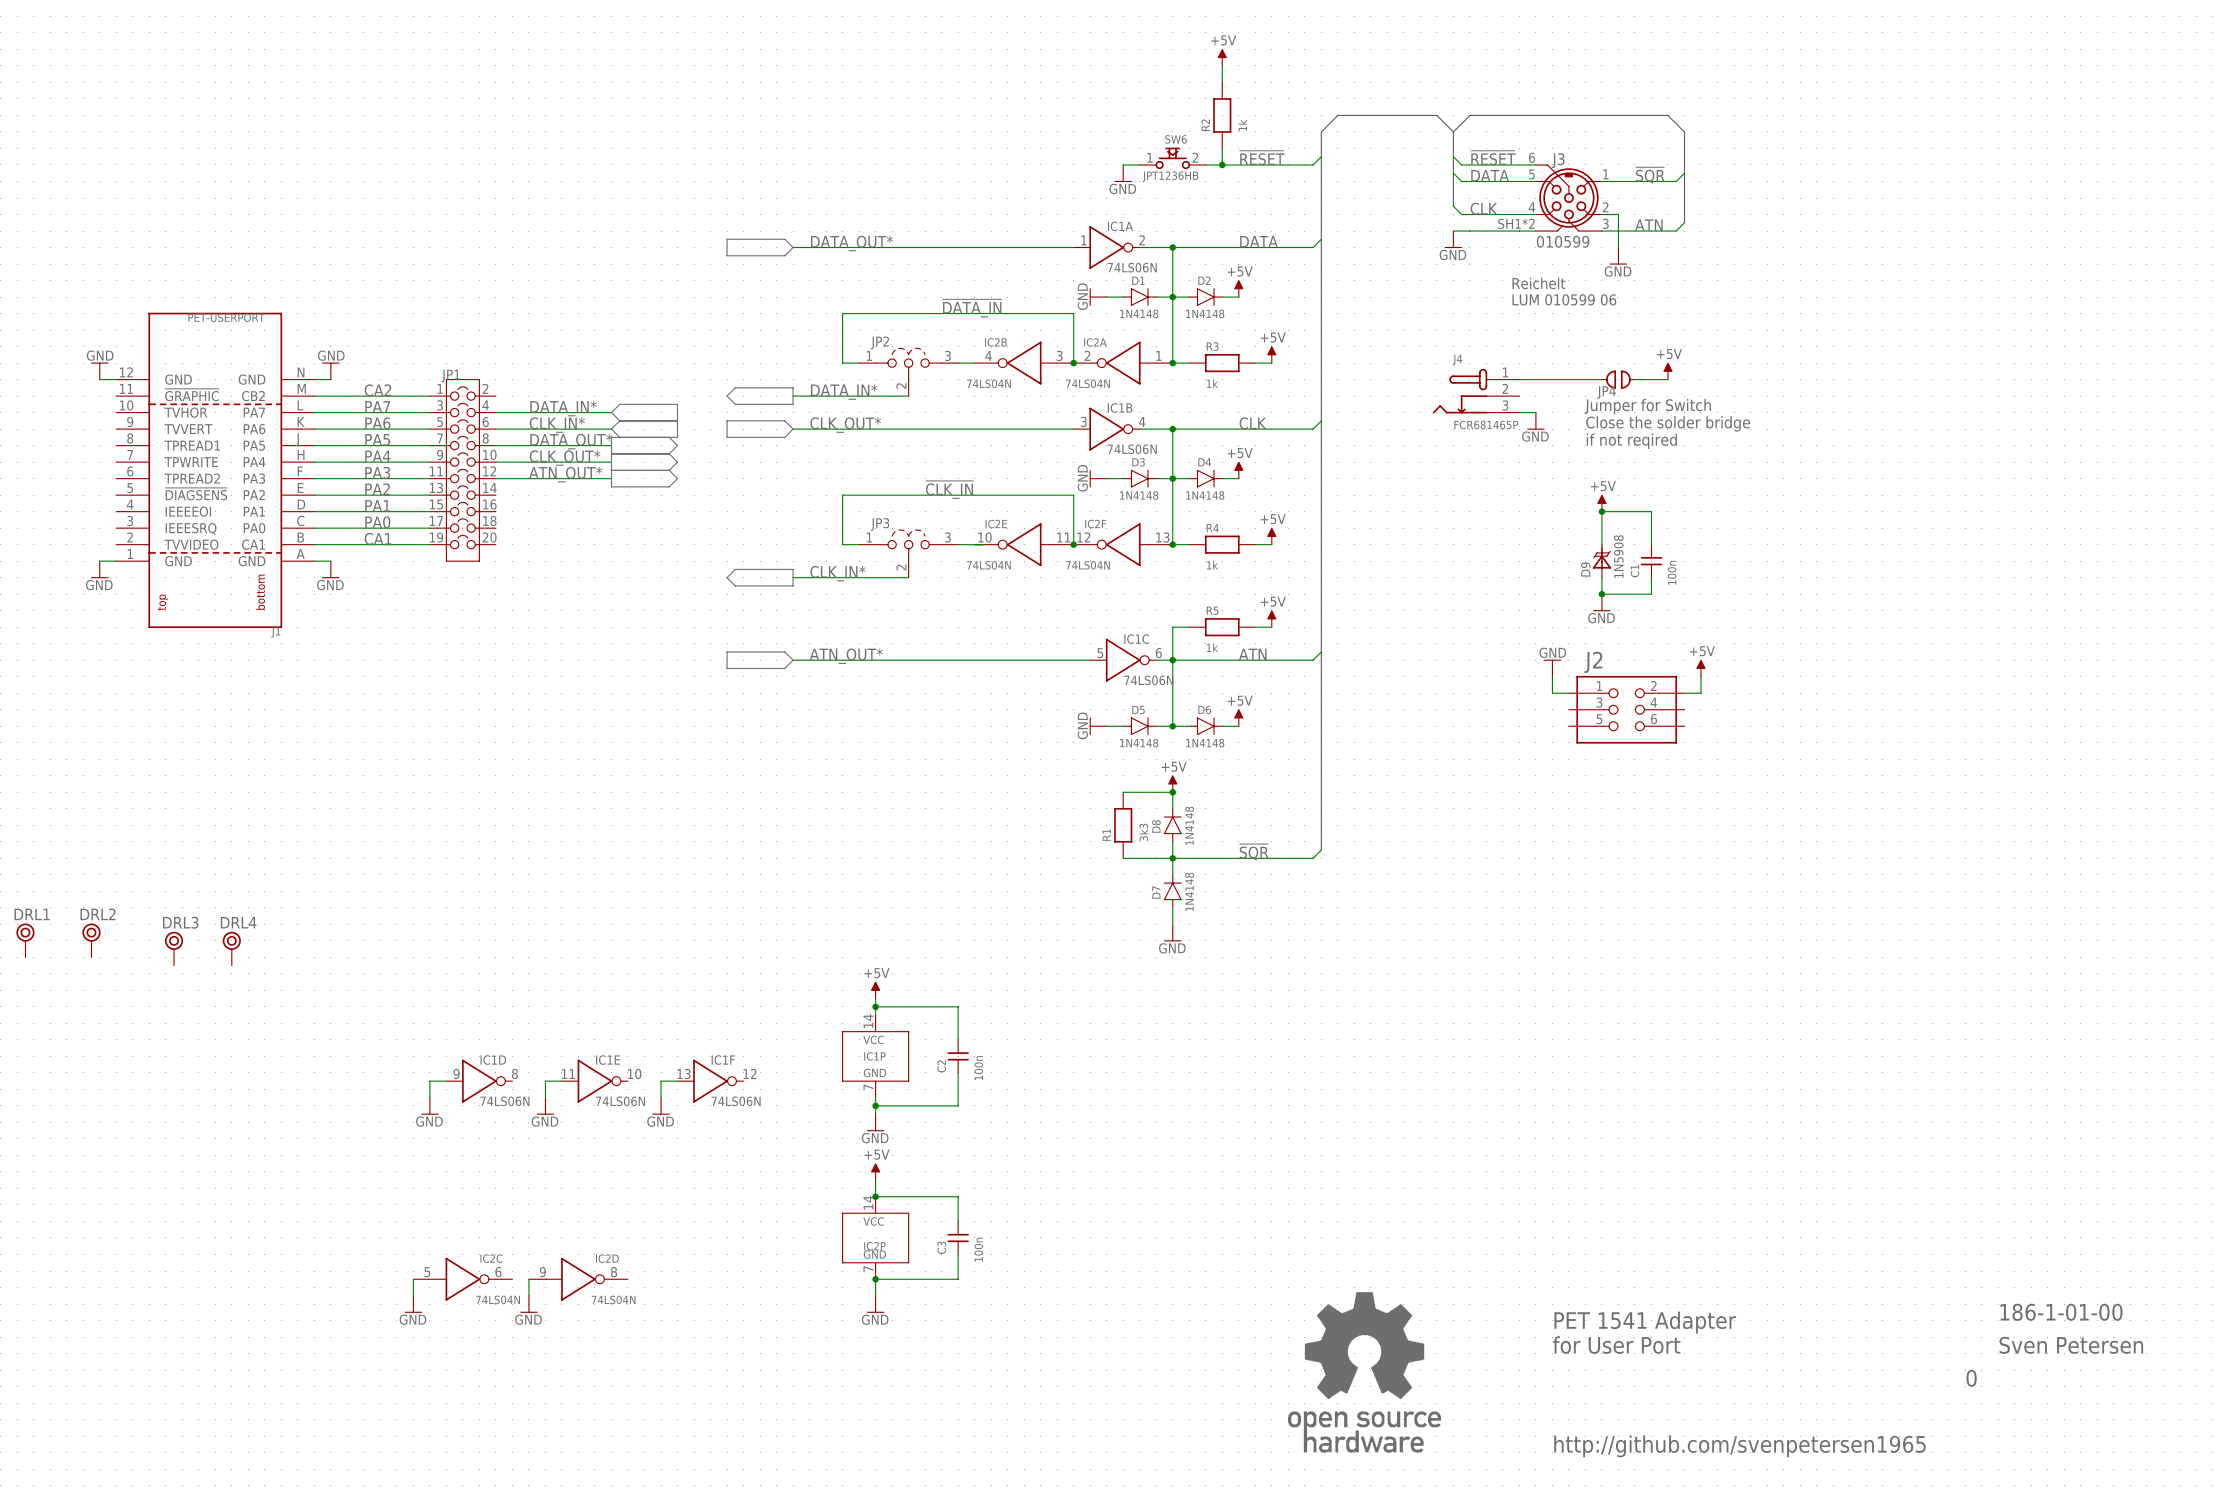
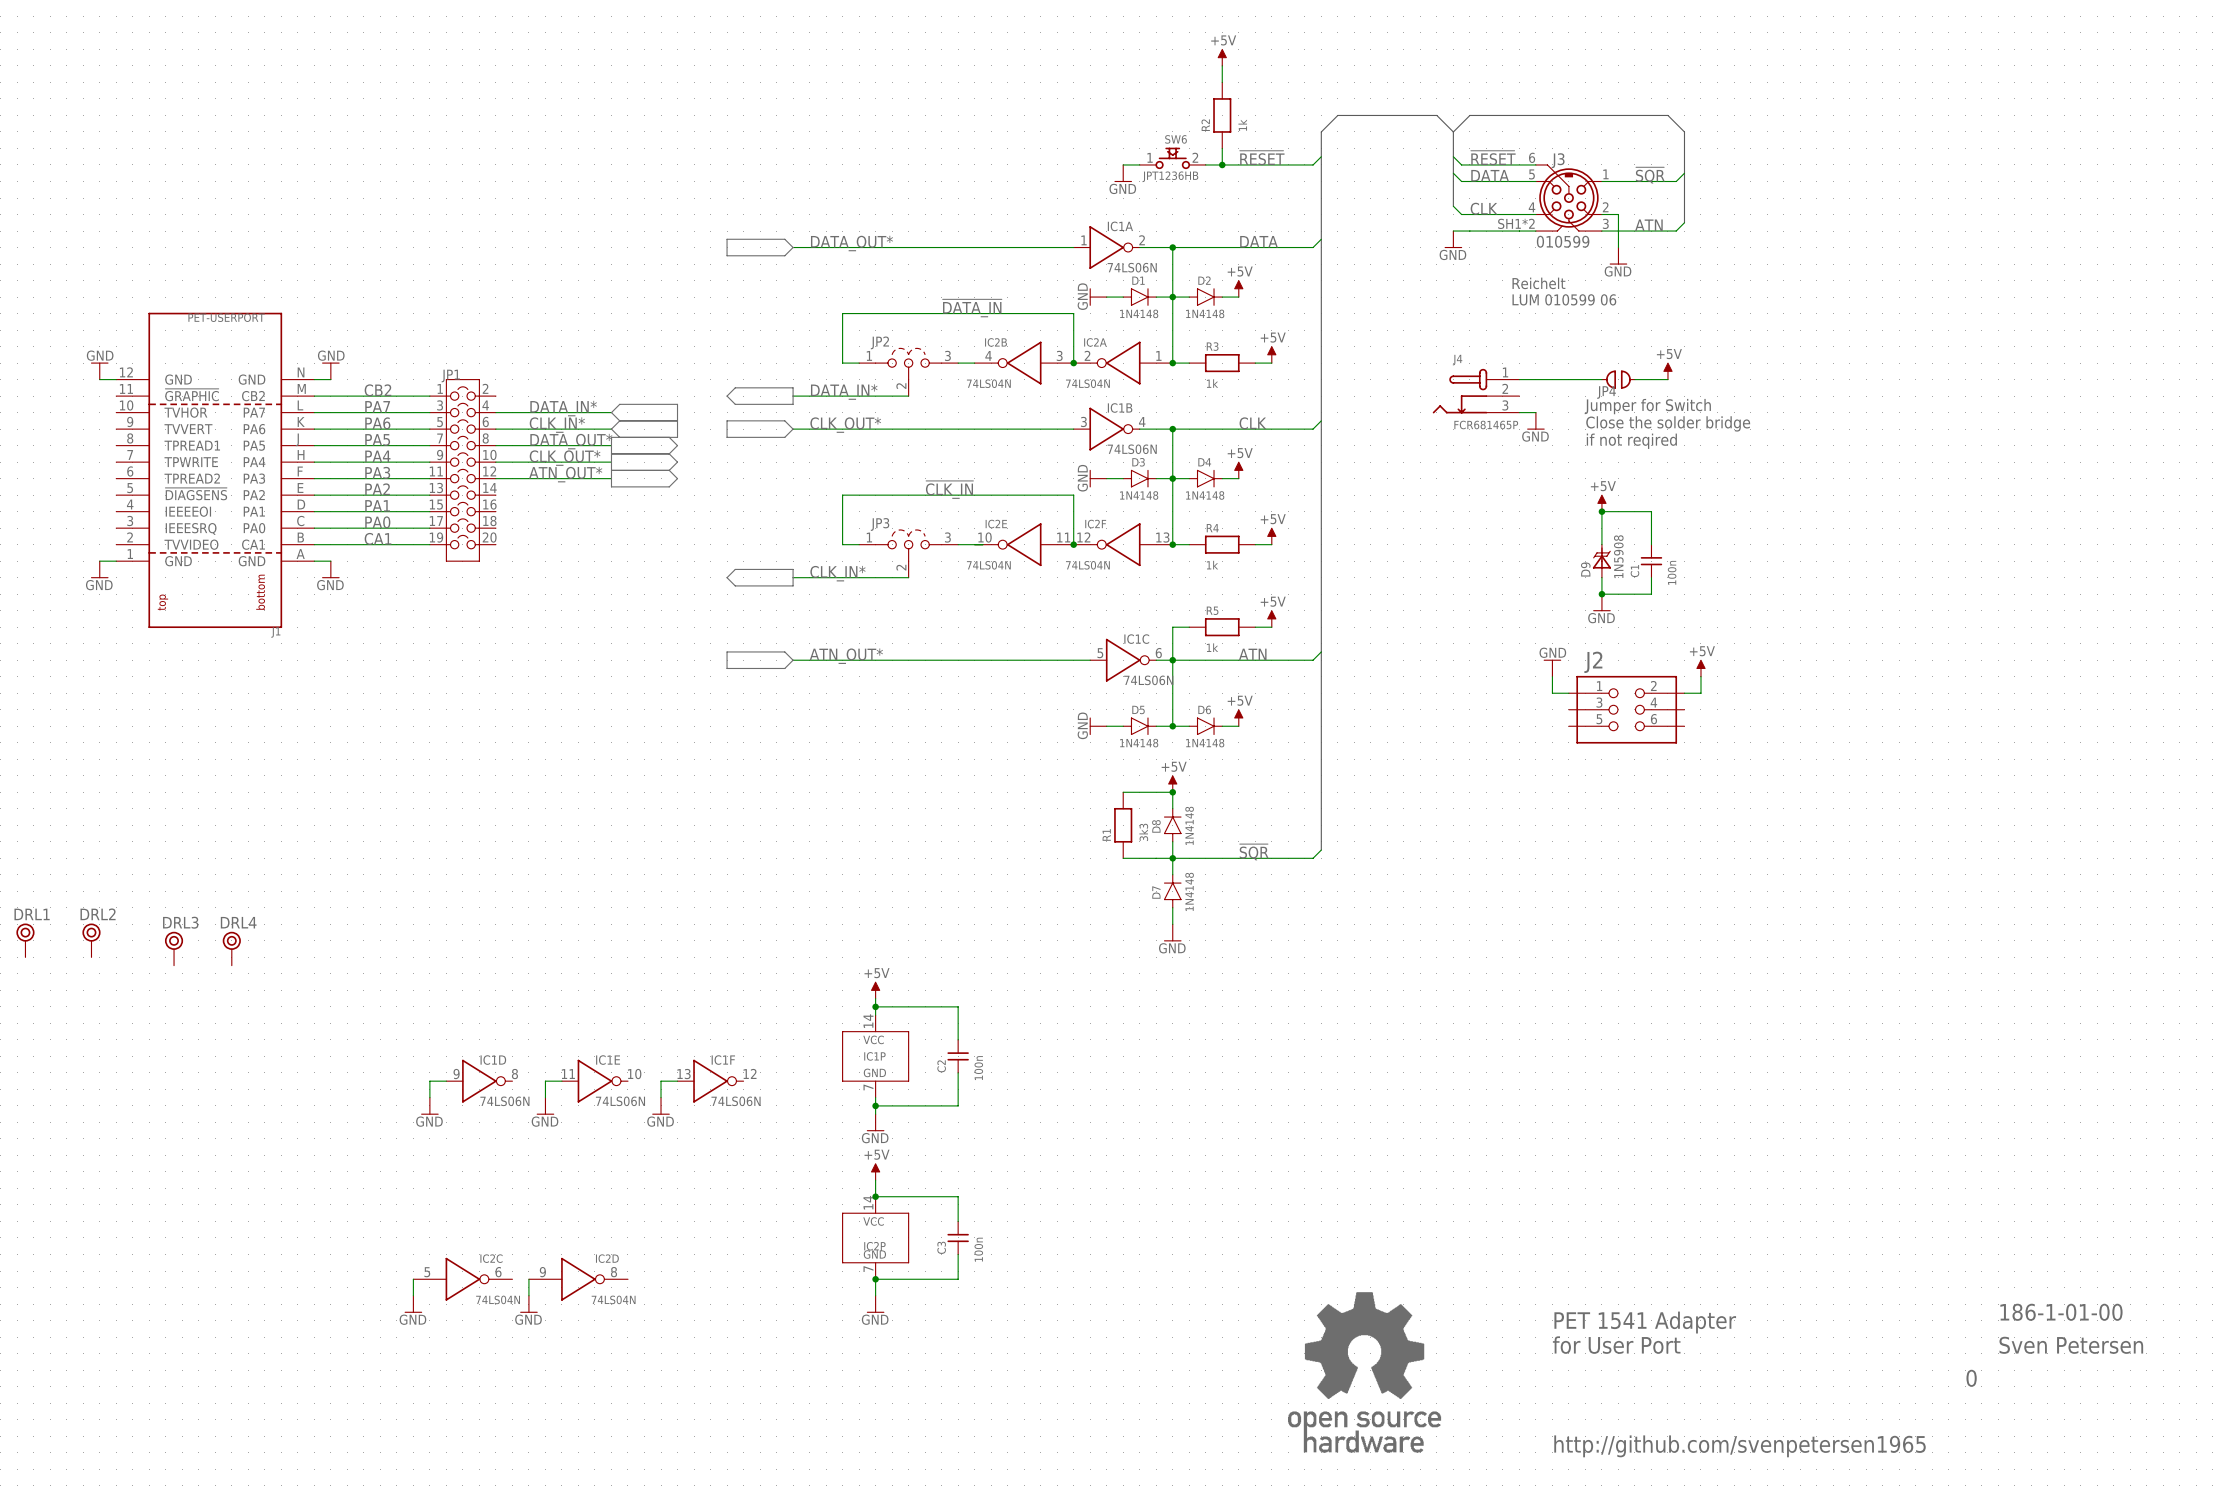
label: CA2 (377, 390) -> CB2 (377, 390)

